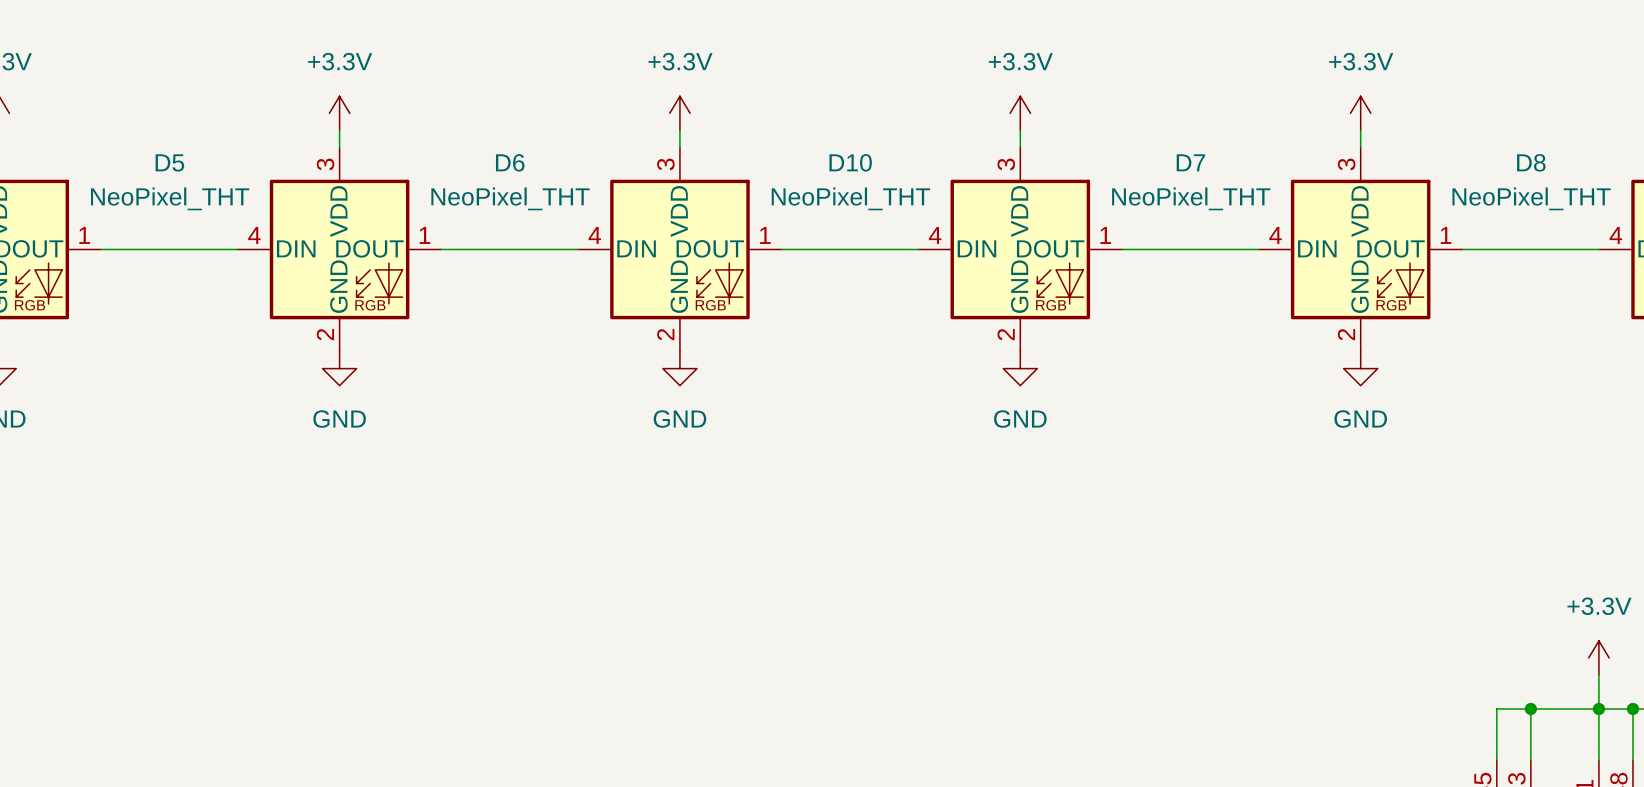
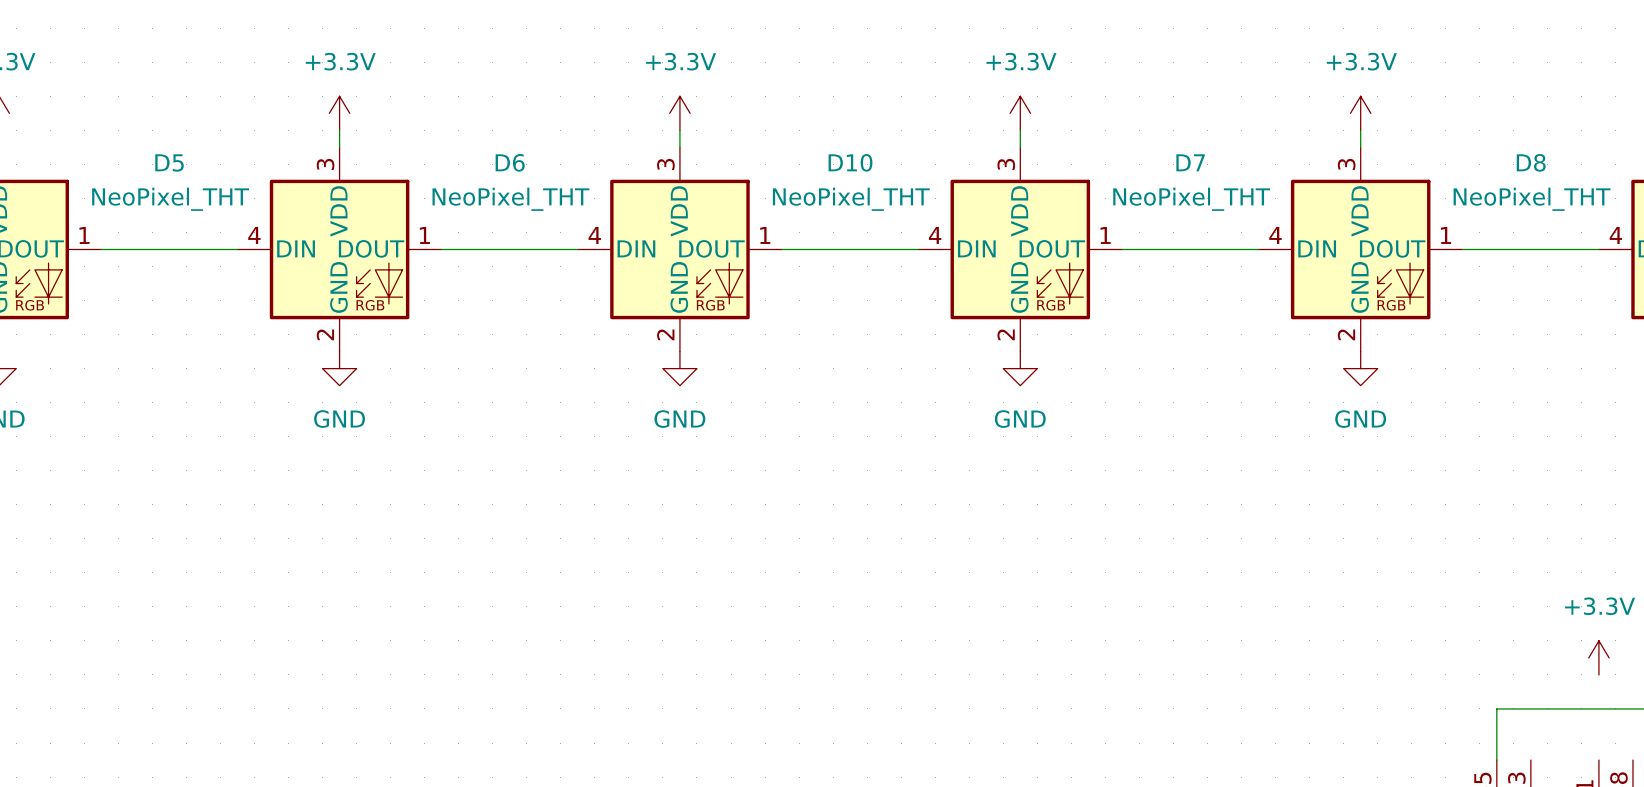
wire: (1598, 674) (1598, 760) -> none
wire: (1530, 708) (1530, 760) -> none
junction: (1530, 708) -> none
junction: (1598, 708) -> none
wire: (1632, 708) (1632, 760) -> none
junction: (1632, 708) -> none

